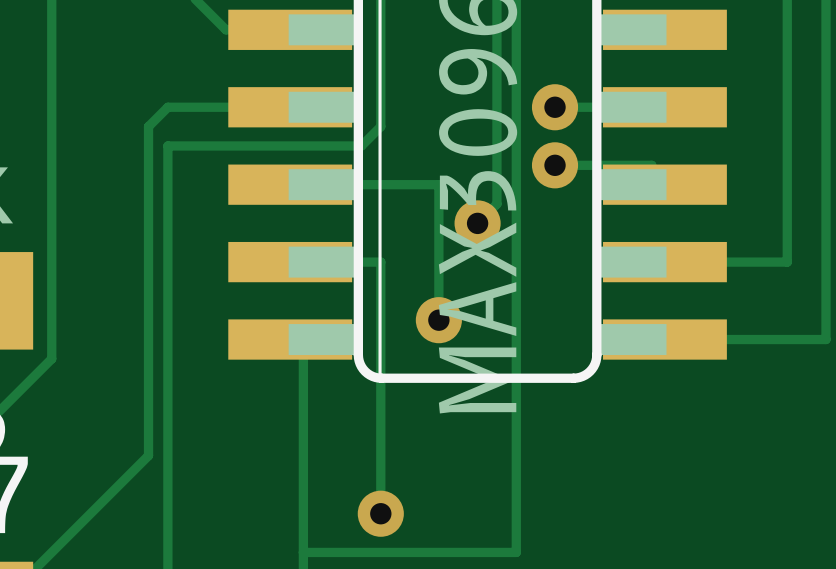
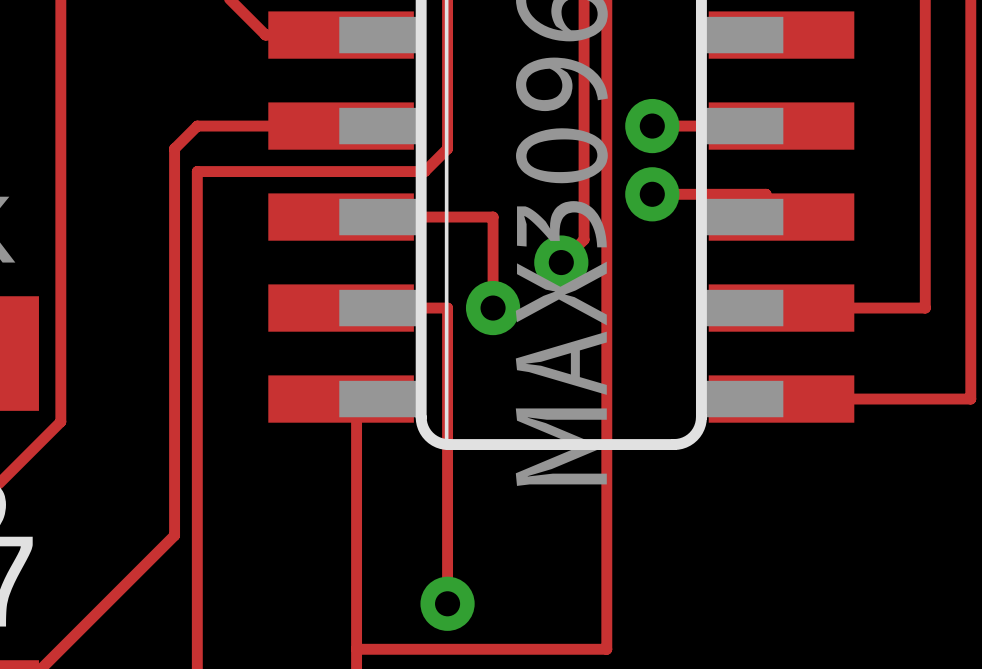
track: (419, 184) (438, 184) (438, 320) -> (493, 217) (493, 308)
via position: (438, 320) -> (493, 308)

